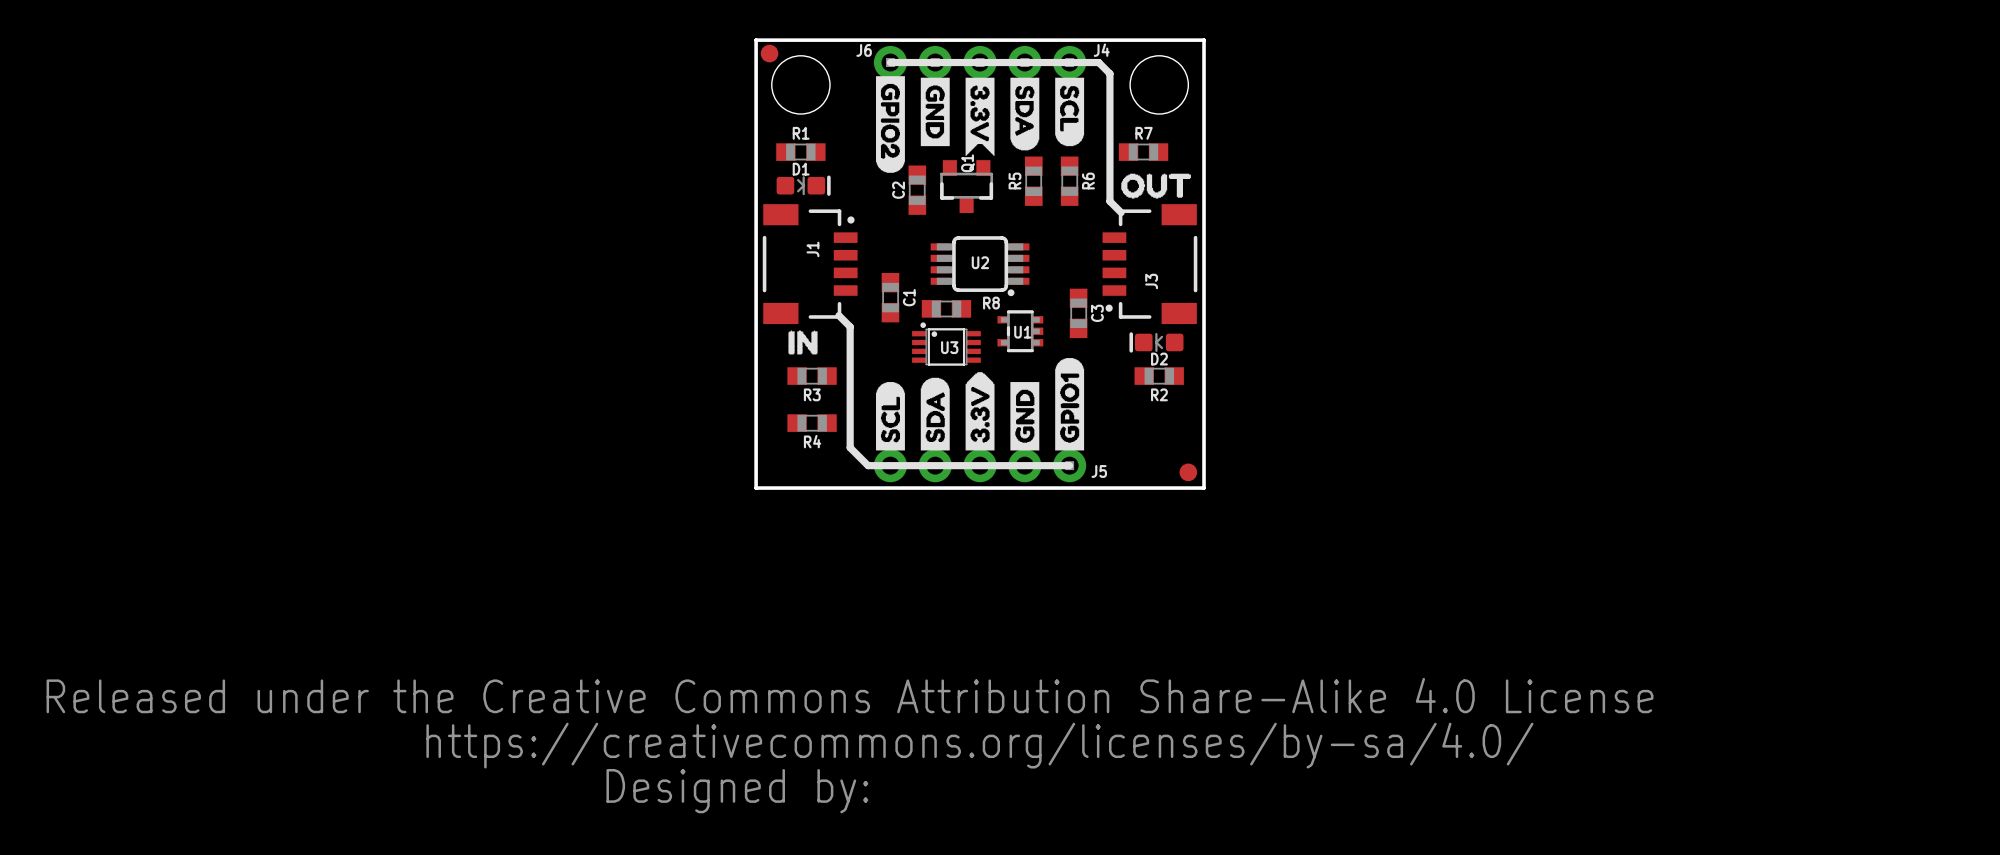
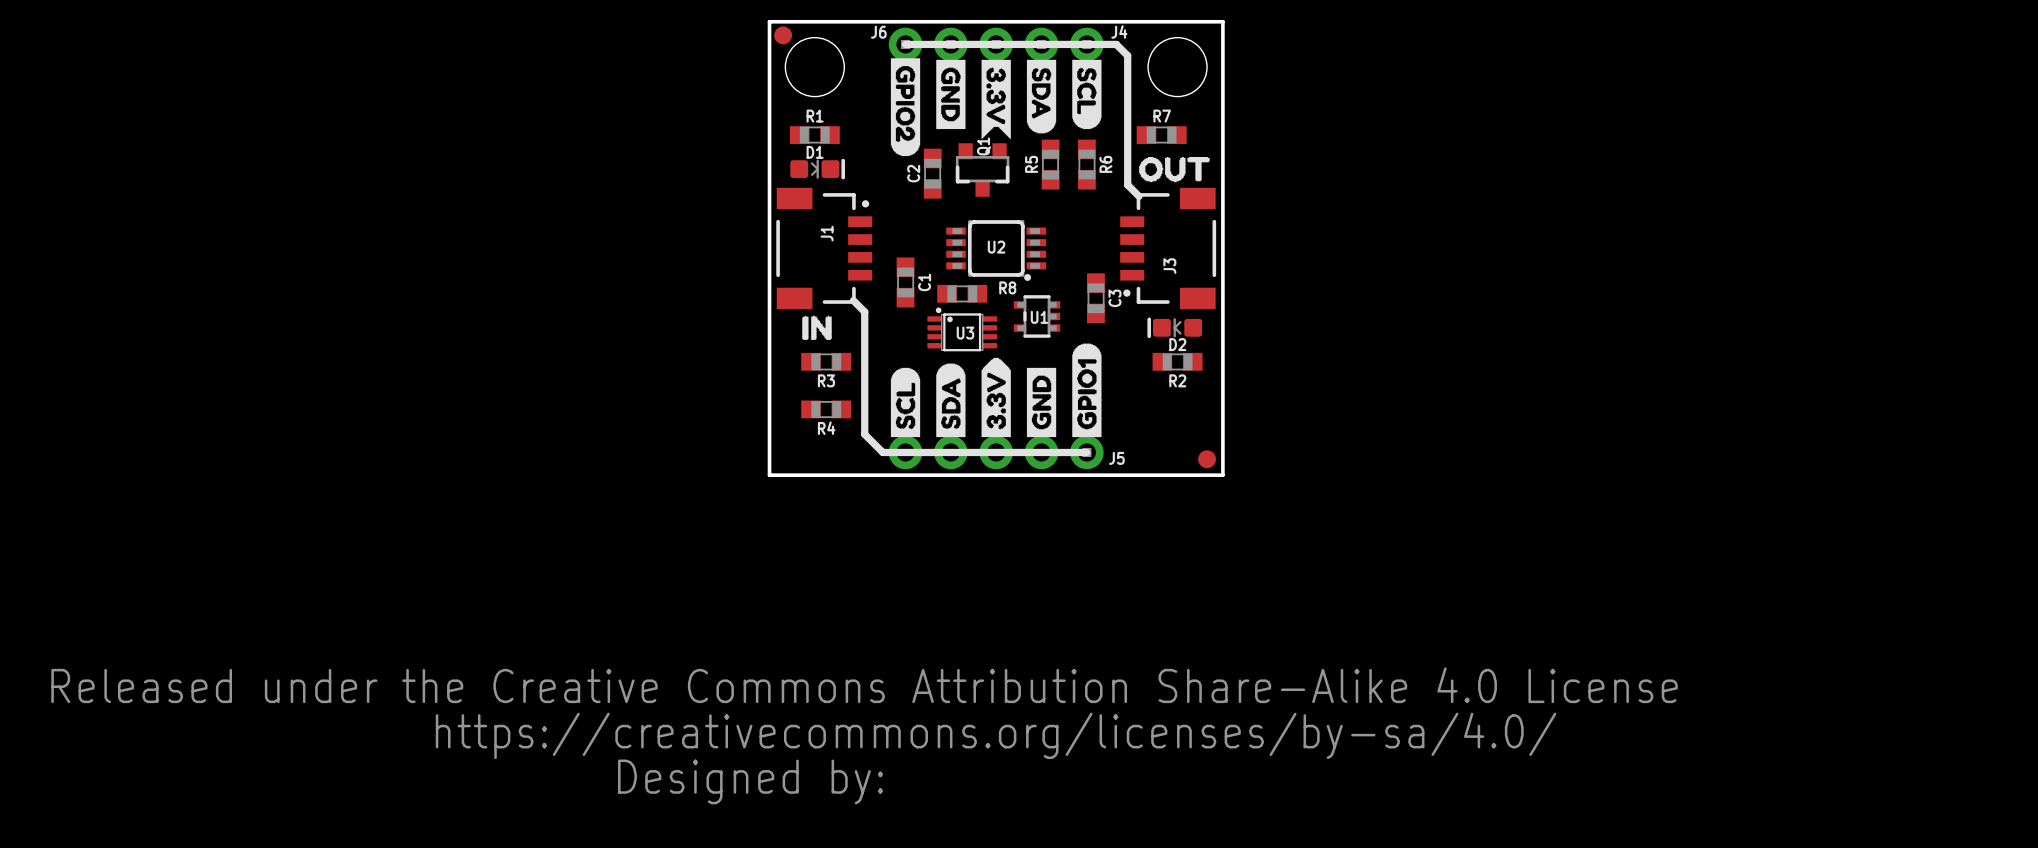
U2 footprint: [930, 236, 1030, 297] -> [946, 220, 1047, 281]

